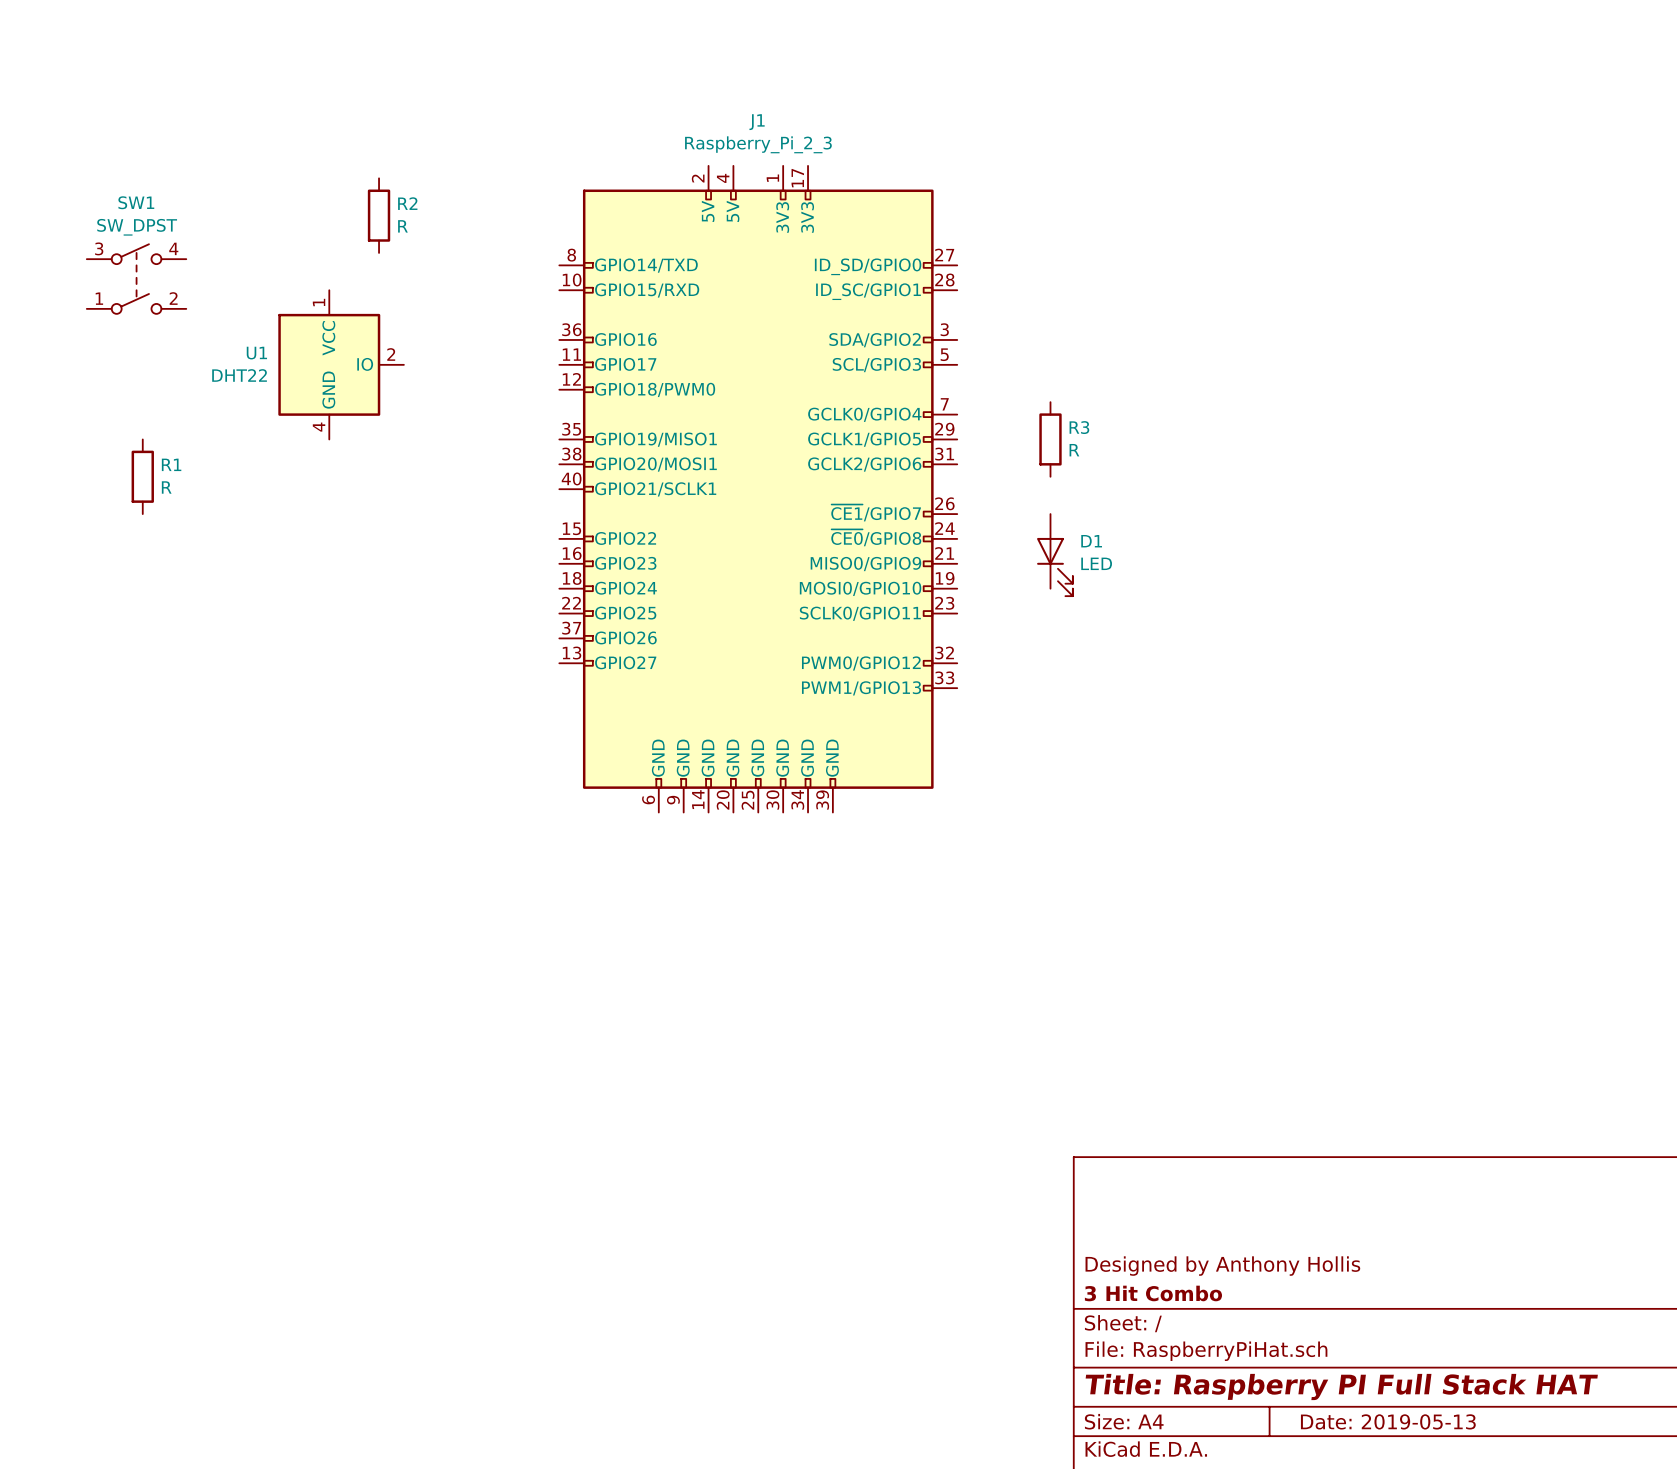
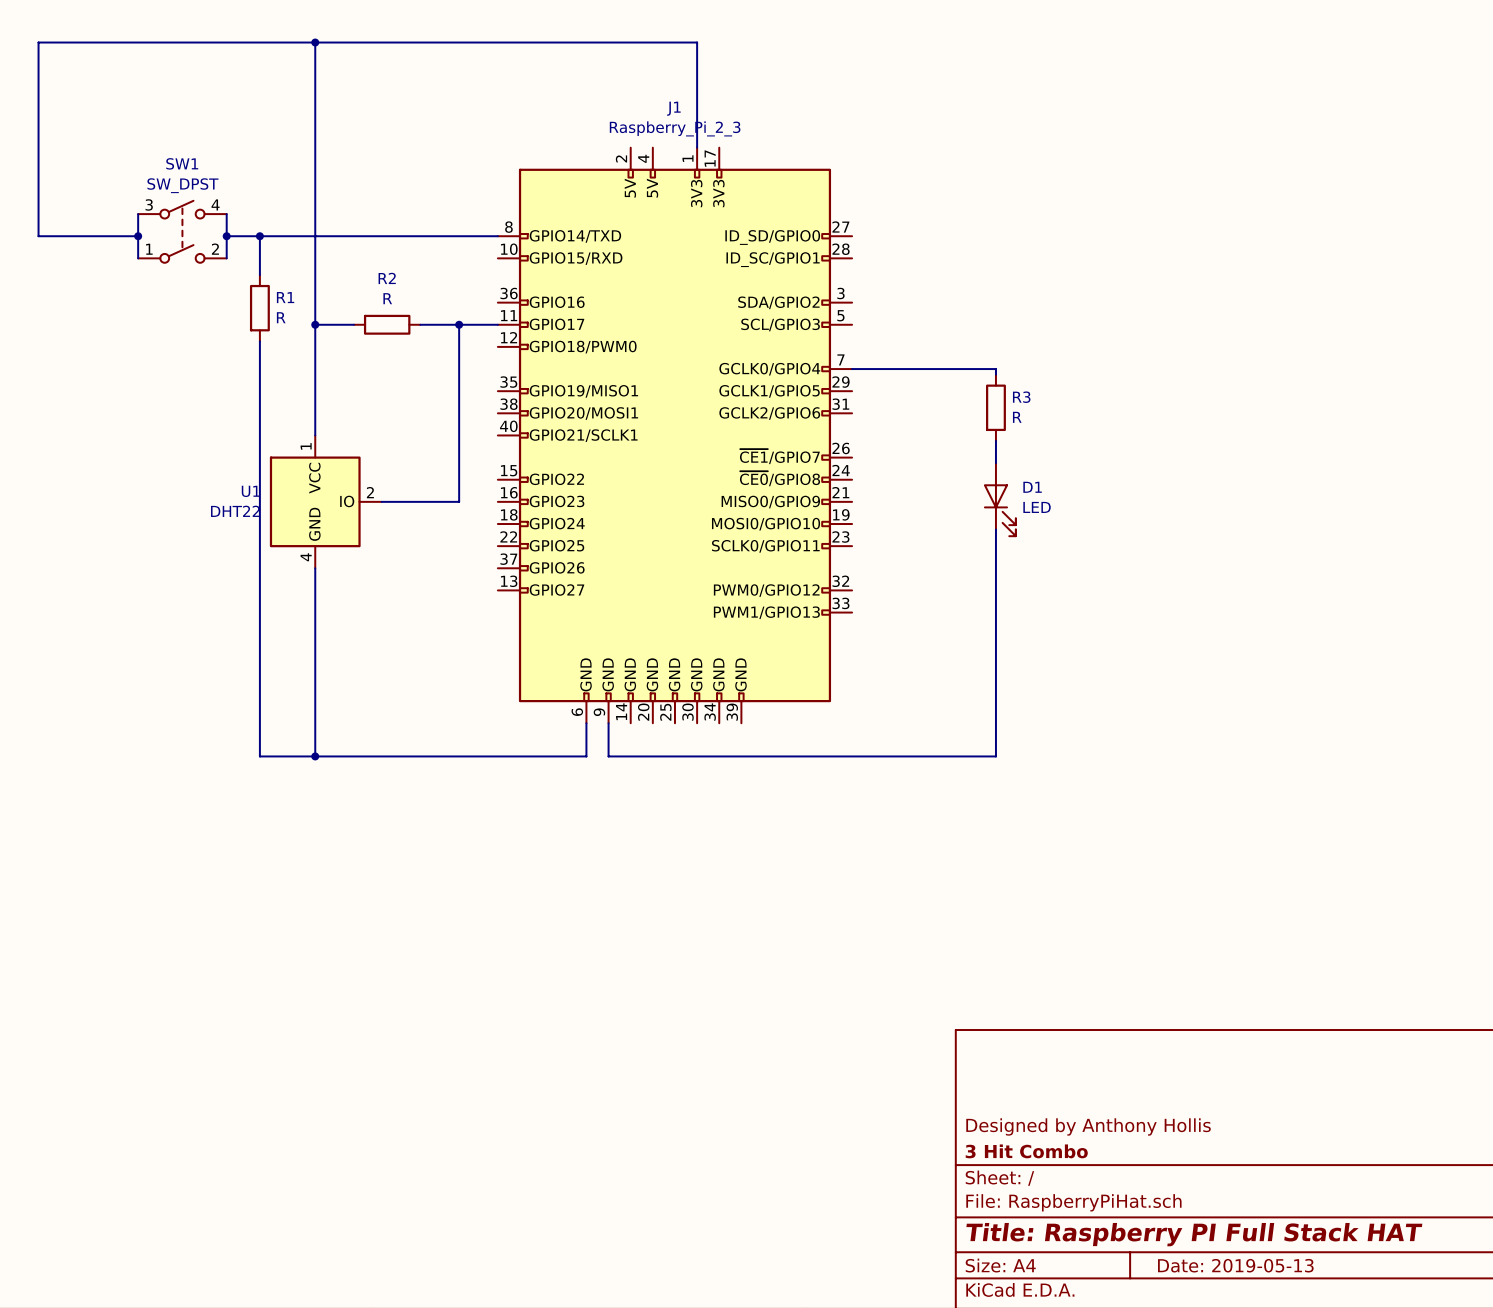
wire: none -> (315, 42) (315, 435)
junction: none -> (315, 42)
wire: none -> (697, 147) (697, 42) (38, 42) (38, 236) (138, 236)
R2 name position: R2 (407, 203) -> R2 (387, 278)
R2 rotation: 0° (379, 215) -> 90° clockwise (387, 324)
R2 position: (379, 215) -> (387, 324)
R2 value position: R (402, 226) -> R (387, 298)
wire: none -> (138, 214) (138, 258)
wire: none -> (226, 214) (226, 258)
junction: none -> (138, 236)
wire: none -> (226, 236) (497, 236)
junction: none -> (226, 236)
wire: none -> (259, 236) (259, 274)
junction: none -> (259, 236)
SW1 position: (136, 279) -> (182, 231)
U1 position: (341, 364) -> (325, 501)
junction: none -> (315, 324)
wire: none -> (420, 324) (497, 324)
wire: none -> (459, 324) (459, 501) (381, 501)
junction: none -> (459, 324)
wire: none -> (259, 341) (259, 756) (586, 756) (586, 723)
wire: none -> (852, 369) (995, 369) (995, 374)
R3 position: (1050, 439) -> (995, 407)
R1 position: (142, 476) -> (259, 308)
wire: none -> (995, 440) (995, 463)
D1 position: (1054, 555) -> (999, 499)
wire: none -> (995, 529) (995, 756) (608, 756) (608, 723)
wire: none -> (315, 568) (315, 756)
junction: none -> (315, 756)

